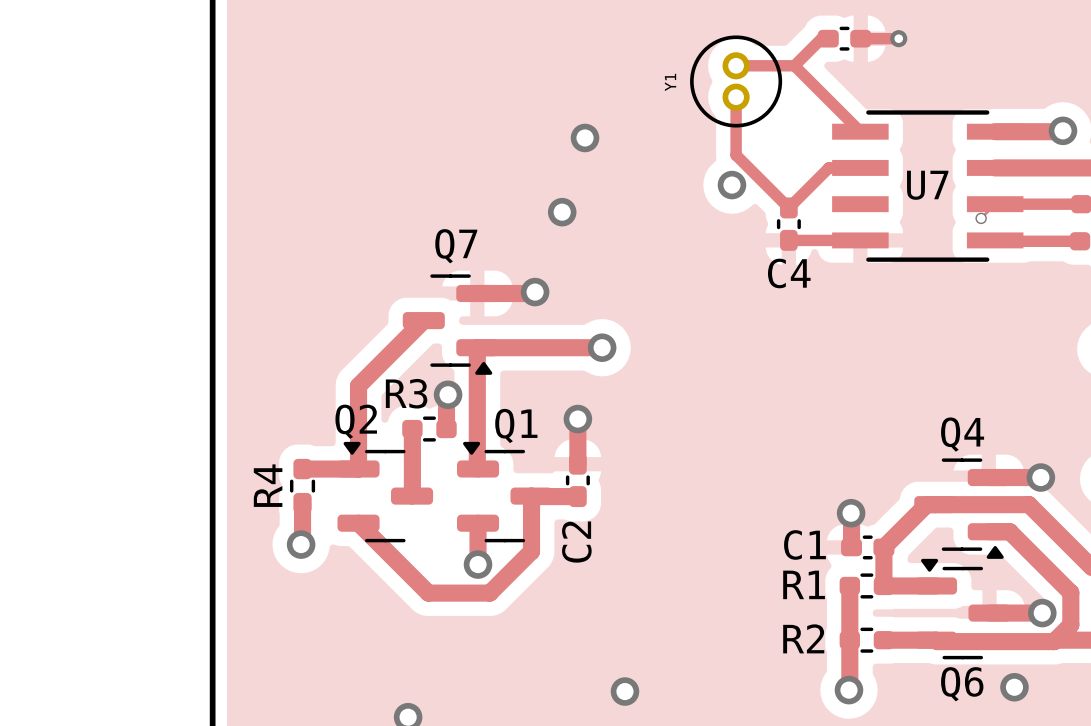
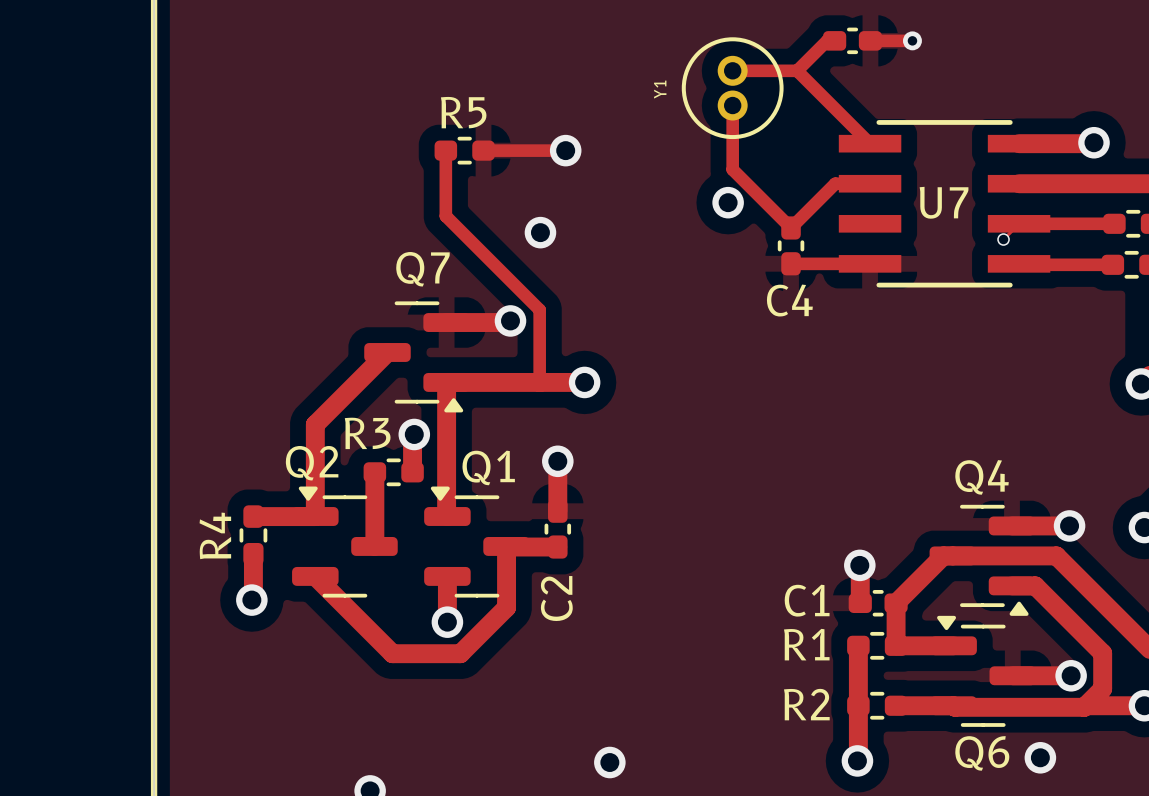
track: none -> (445, 150) (445, 216) (539, 309) (539, 382)
R5: none -> (464, 150)
track: none -> (483, 150) (565, 150)

